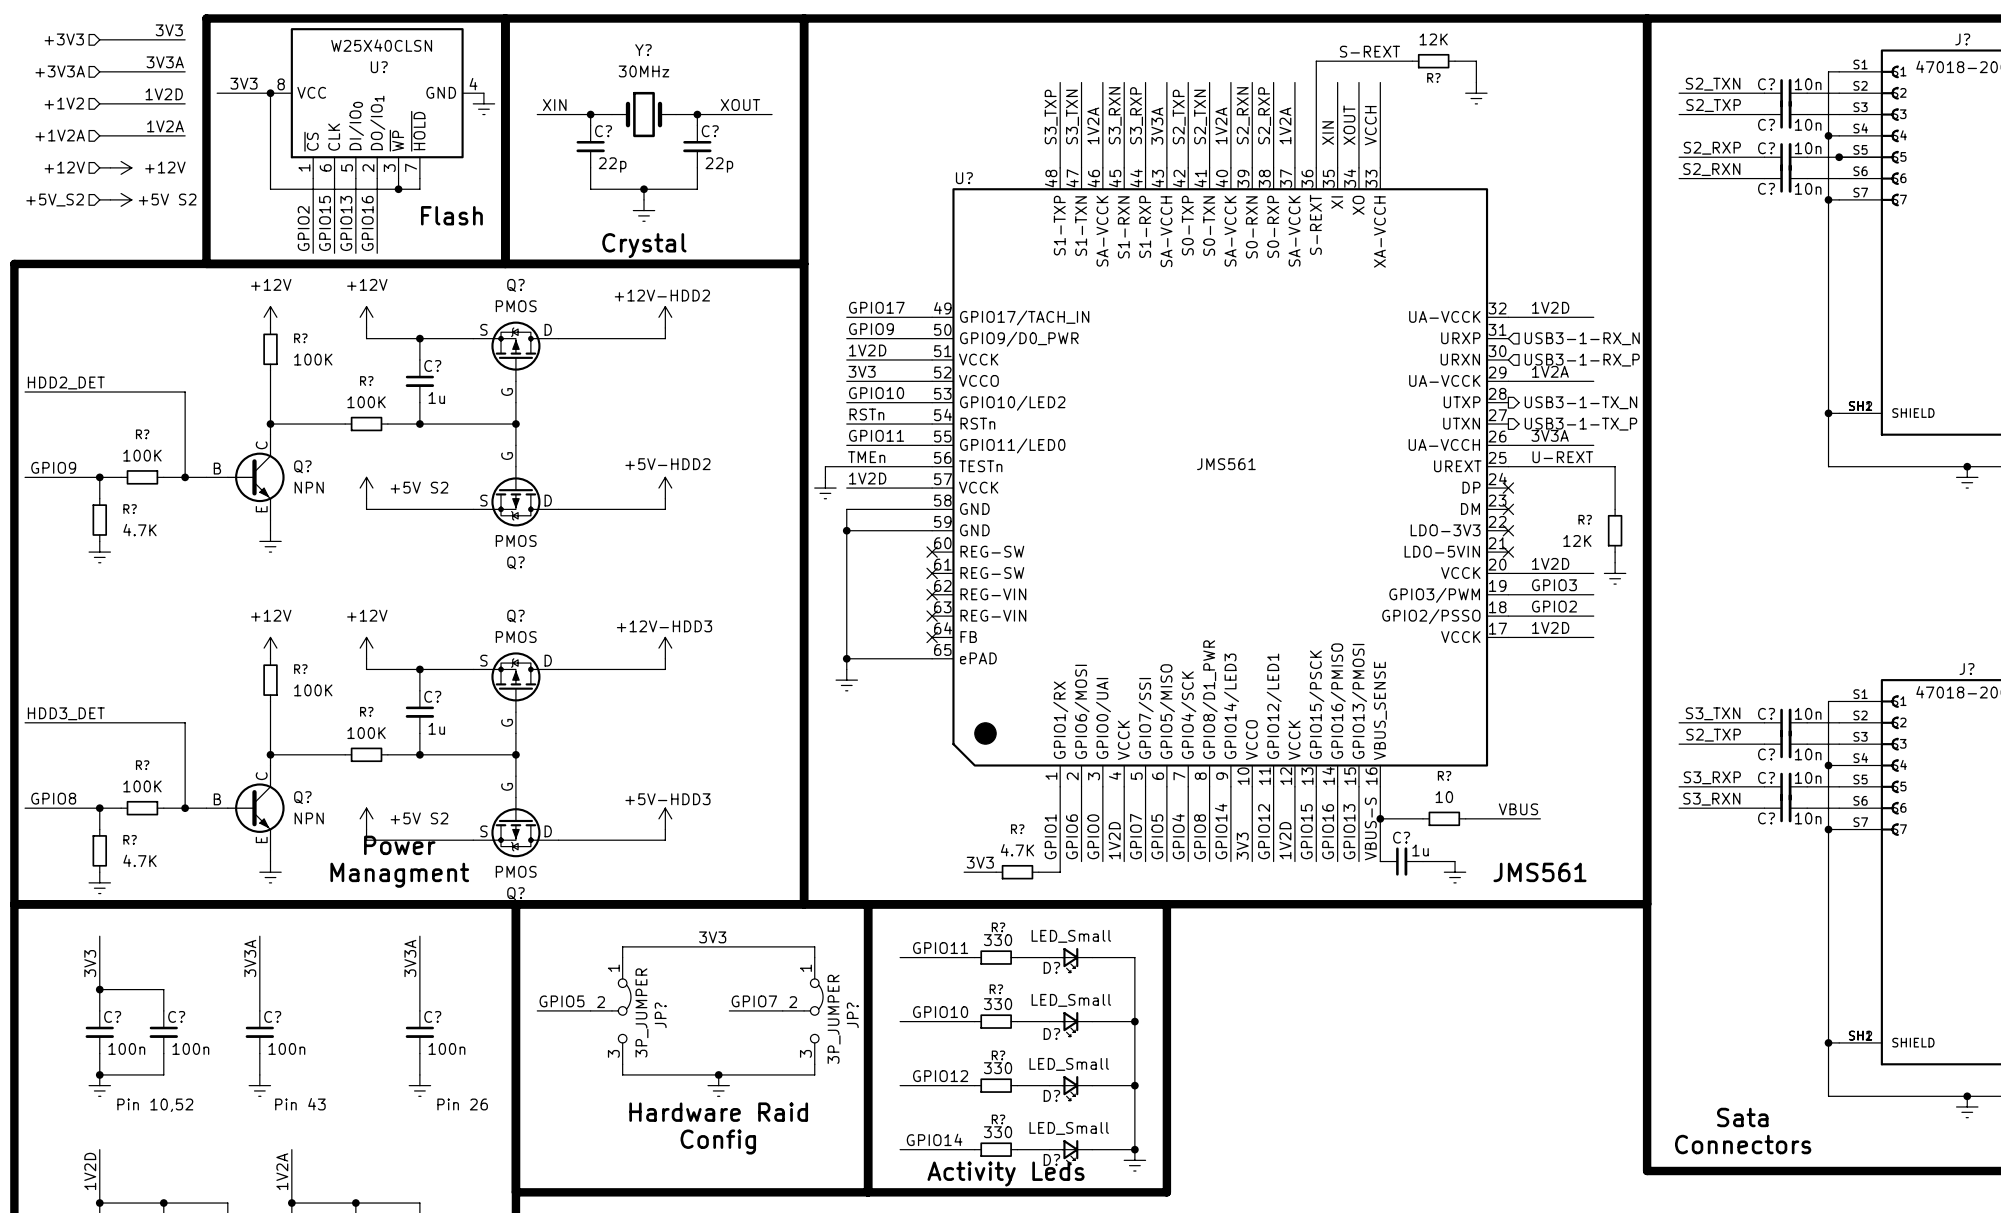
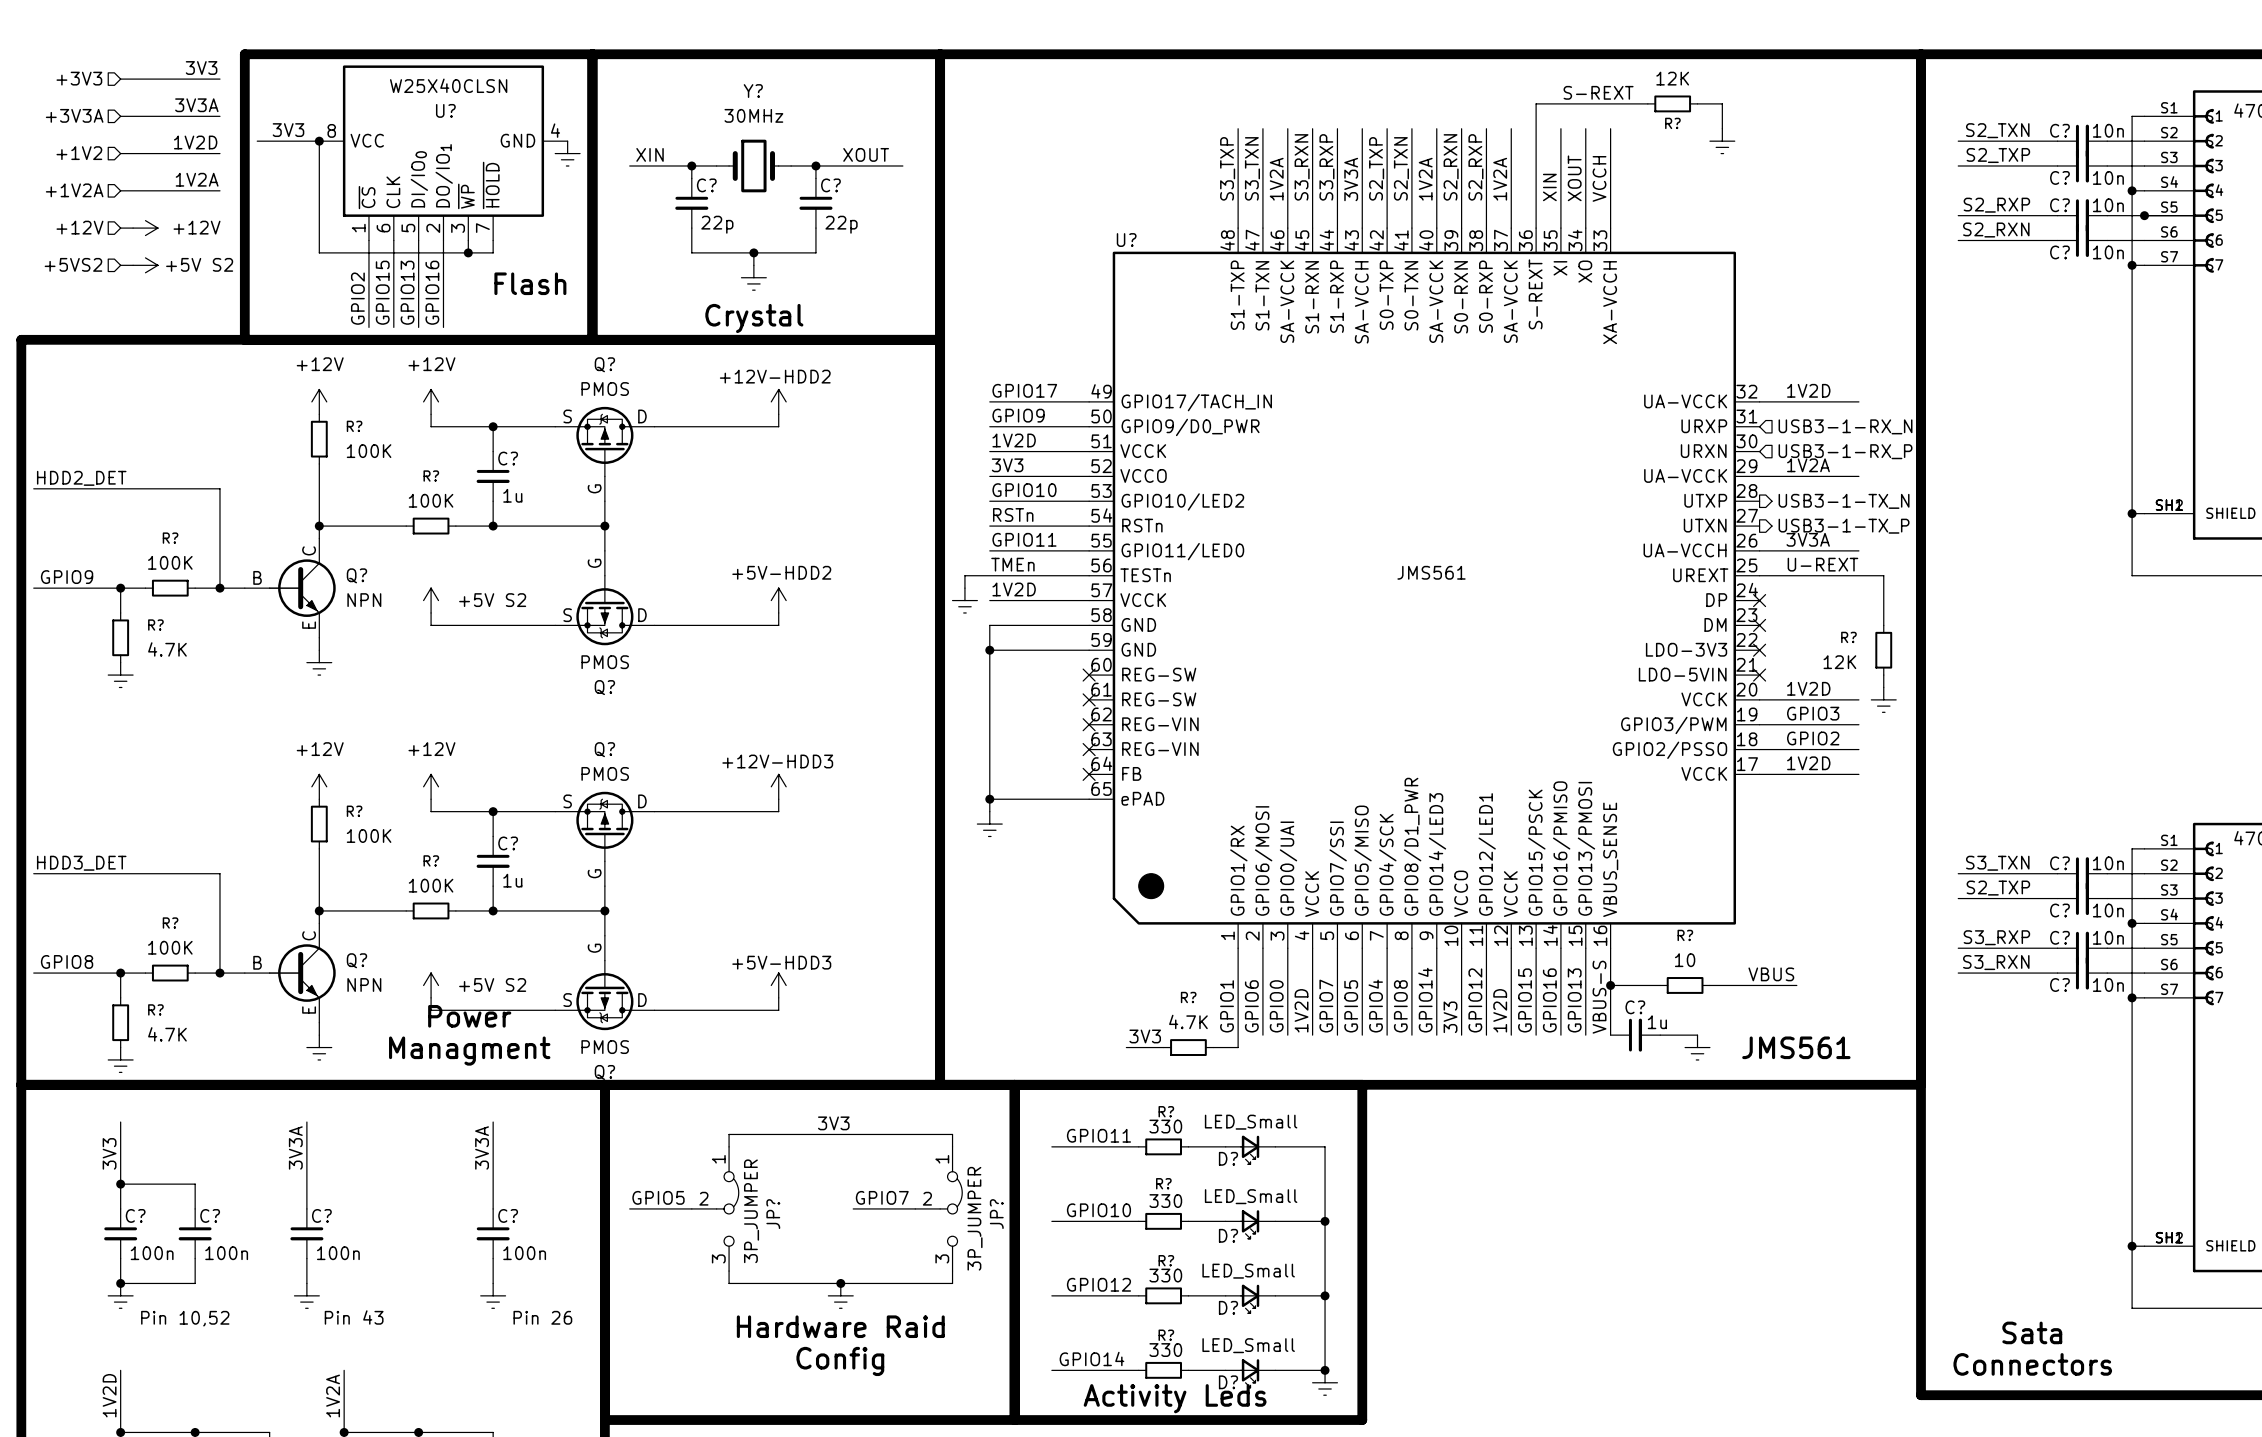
hierarchical label: +5V_S2 (55, 200) -> +5VS2 (73, 264)

